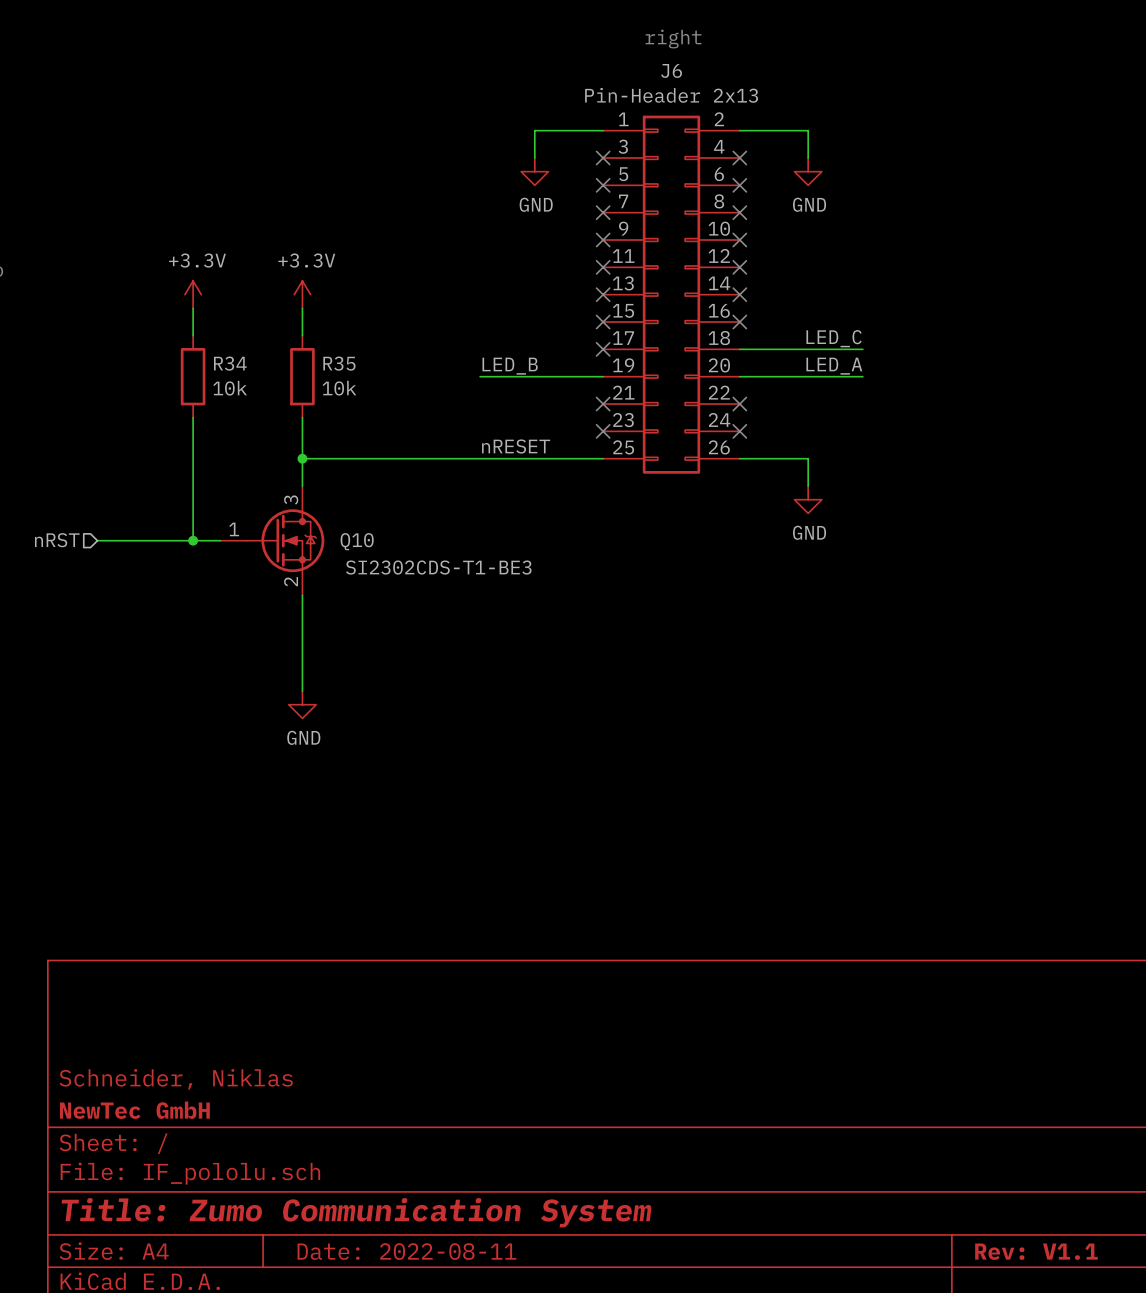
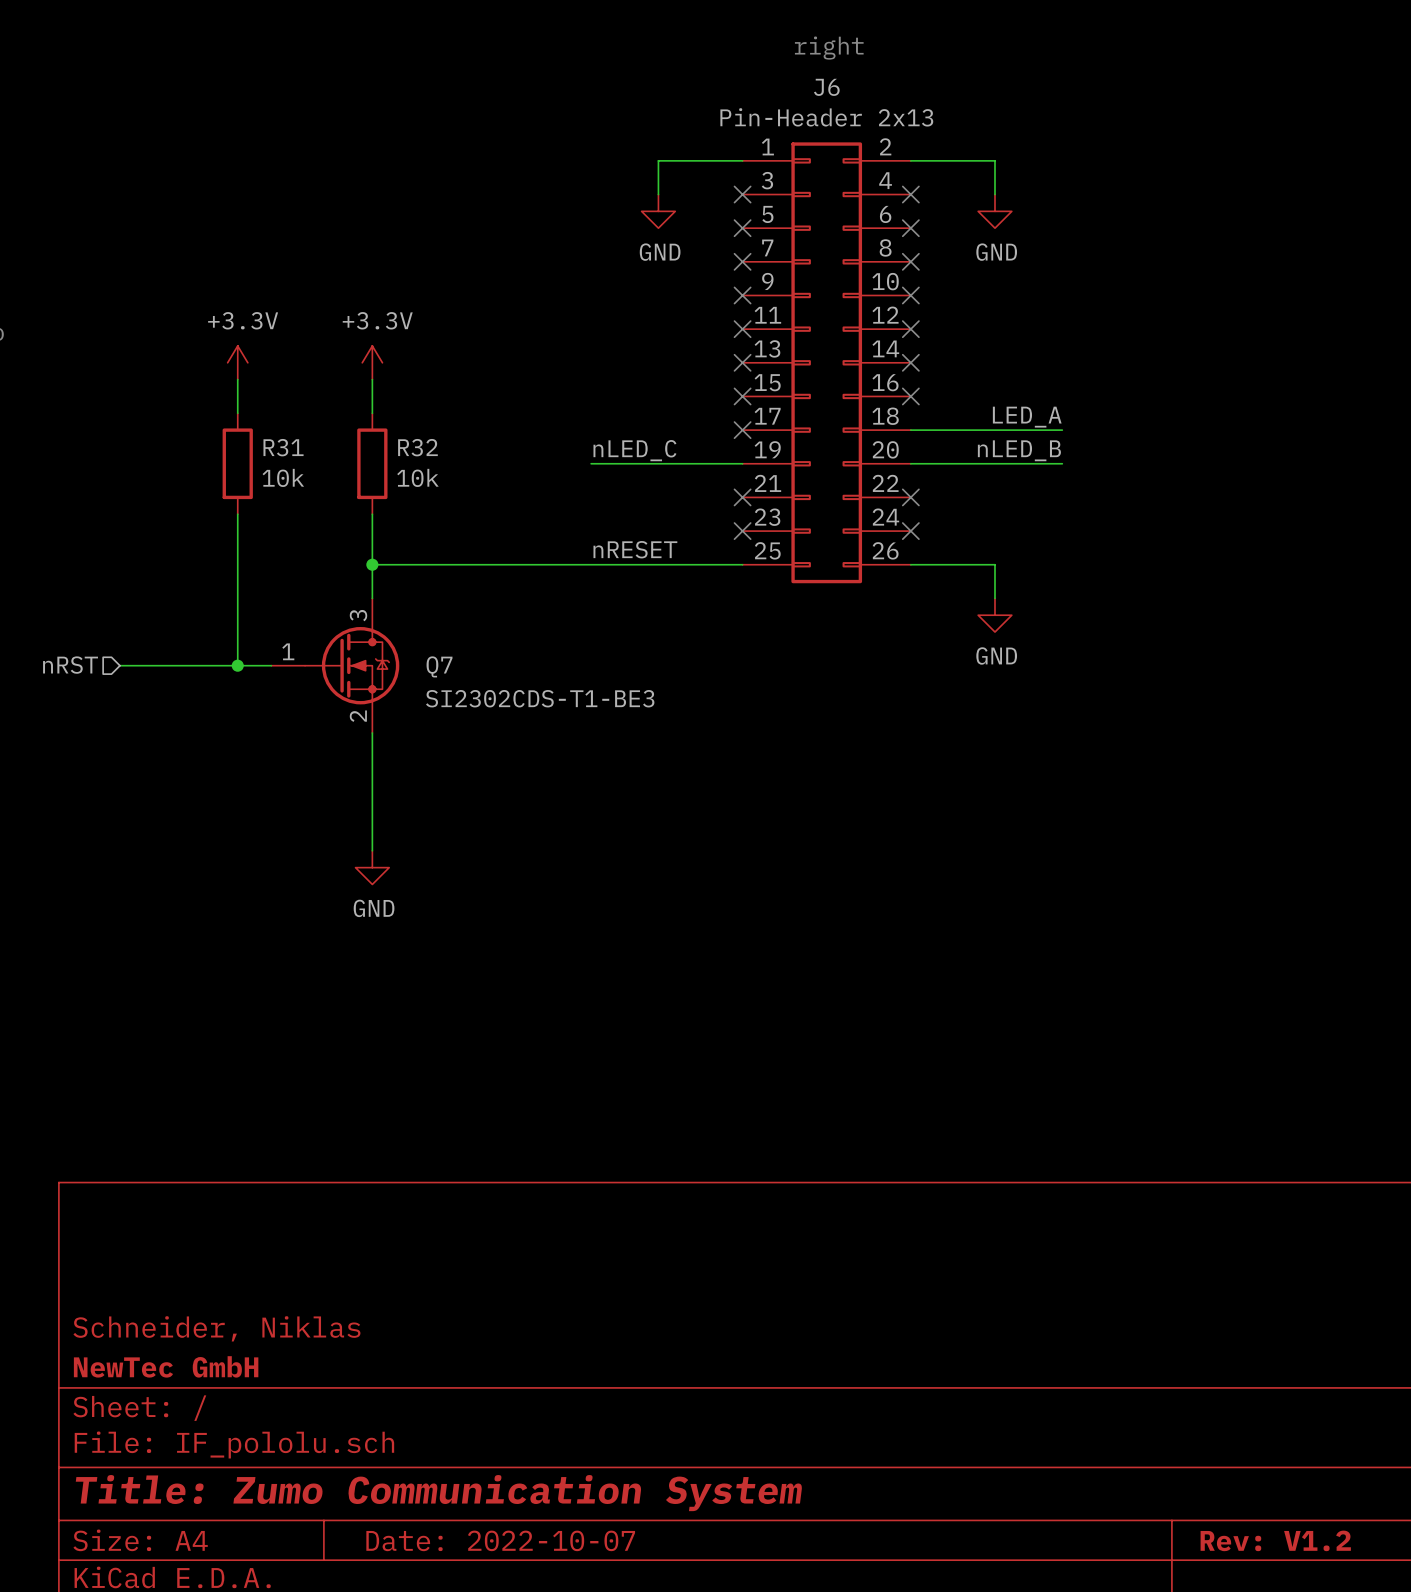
label: LED_C (834, 338) -> LED_A (1027, 417)
R34 name: R34 (230, 363) -> R31 (283, 447)
R35 name: R35 (339, 363) -> R32 (417, 447)
label: LED_B (510, 366) -> nLED_C (634, 450)
label: LED_A (834, 366) -> nLED_B (1019, 450)
Q10 name: Q10 (357, 541) -> Q7 (439, 666)
title block: Date: 2022-08-11 (406, 1251) -> Date: 2022-10-07 (500, 1540)
title block: Rev: V1.1 (1036, 1251) -> Rev: V1.2 (1275, 1540)

